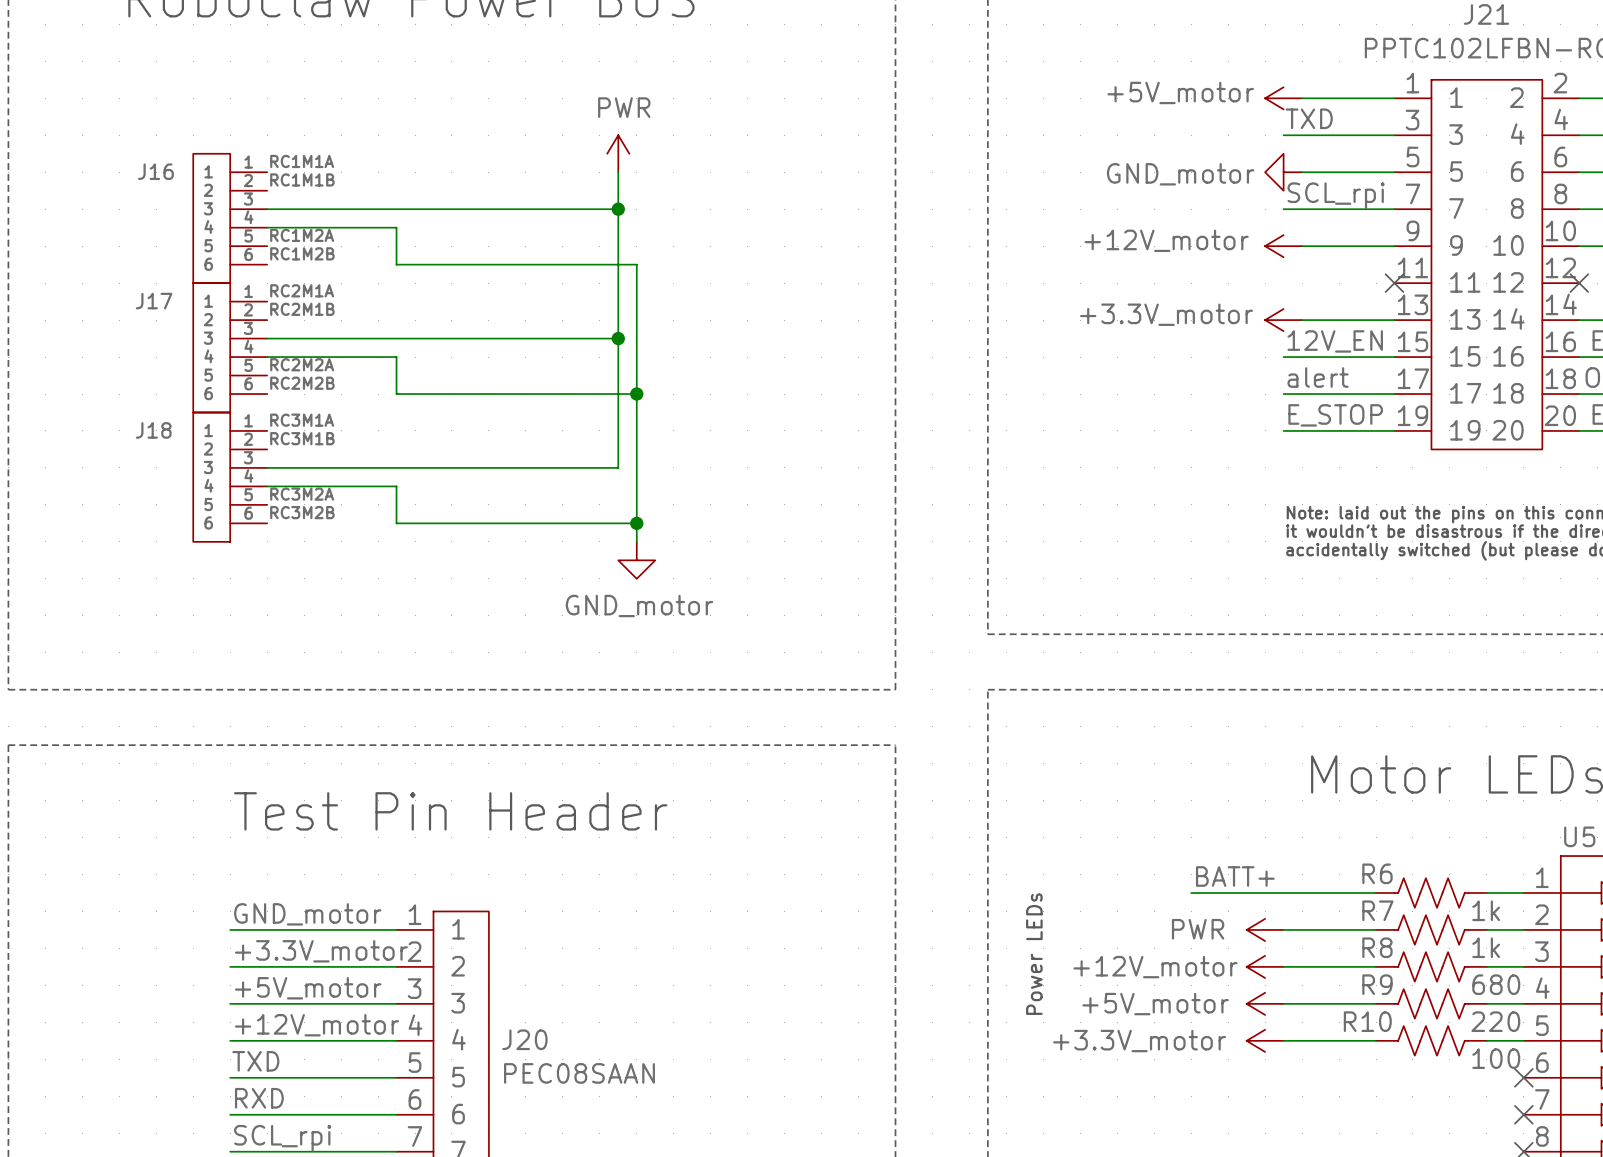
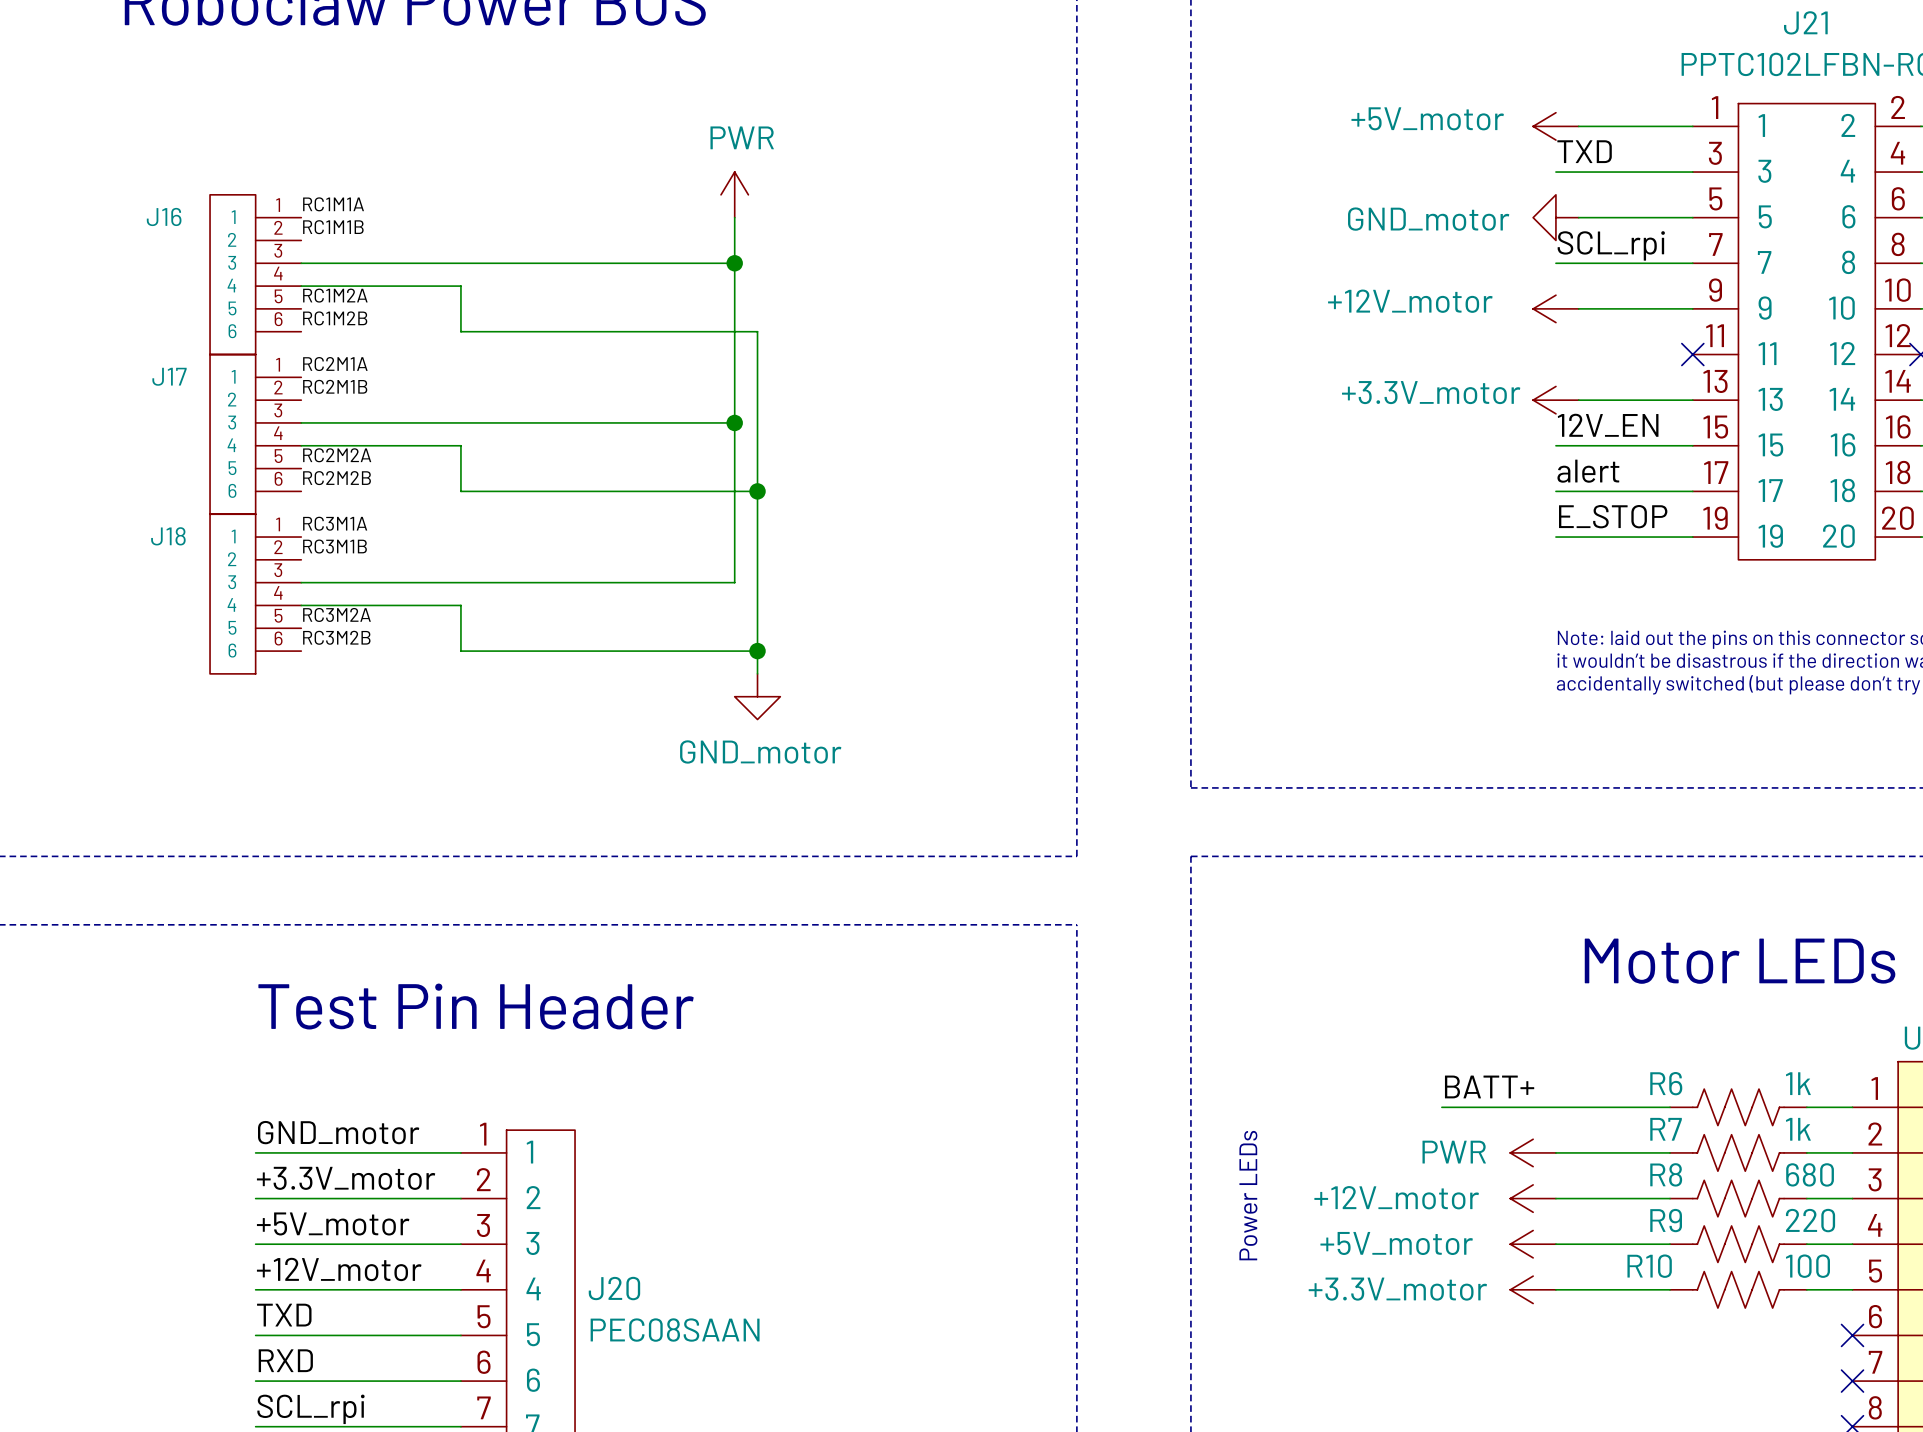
R6 value position: 1k (1486, 910) -> 1k (1798, 1083)
R7 value position: 1k (1486, 947) -> 1k (1798, 1129)
R8 value position: 680 (1496, 984) -> 680 (1810, 1174)
R9 value position: 220 (1495, 1021) -> 220 (1810, 1220)
R10 value position: 100 (1496, 1058) -> 100 (1807, 1266)

